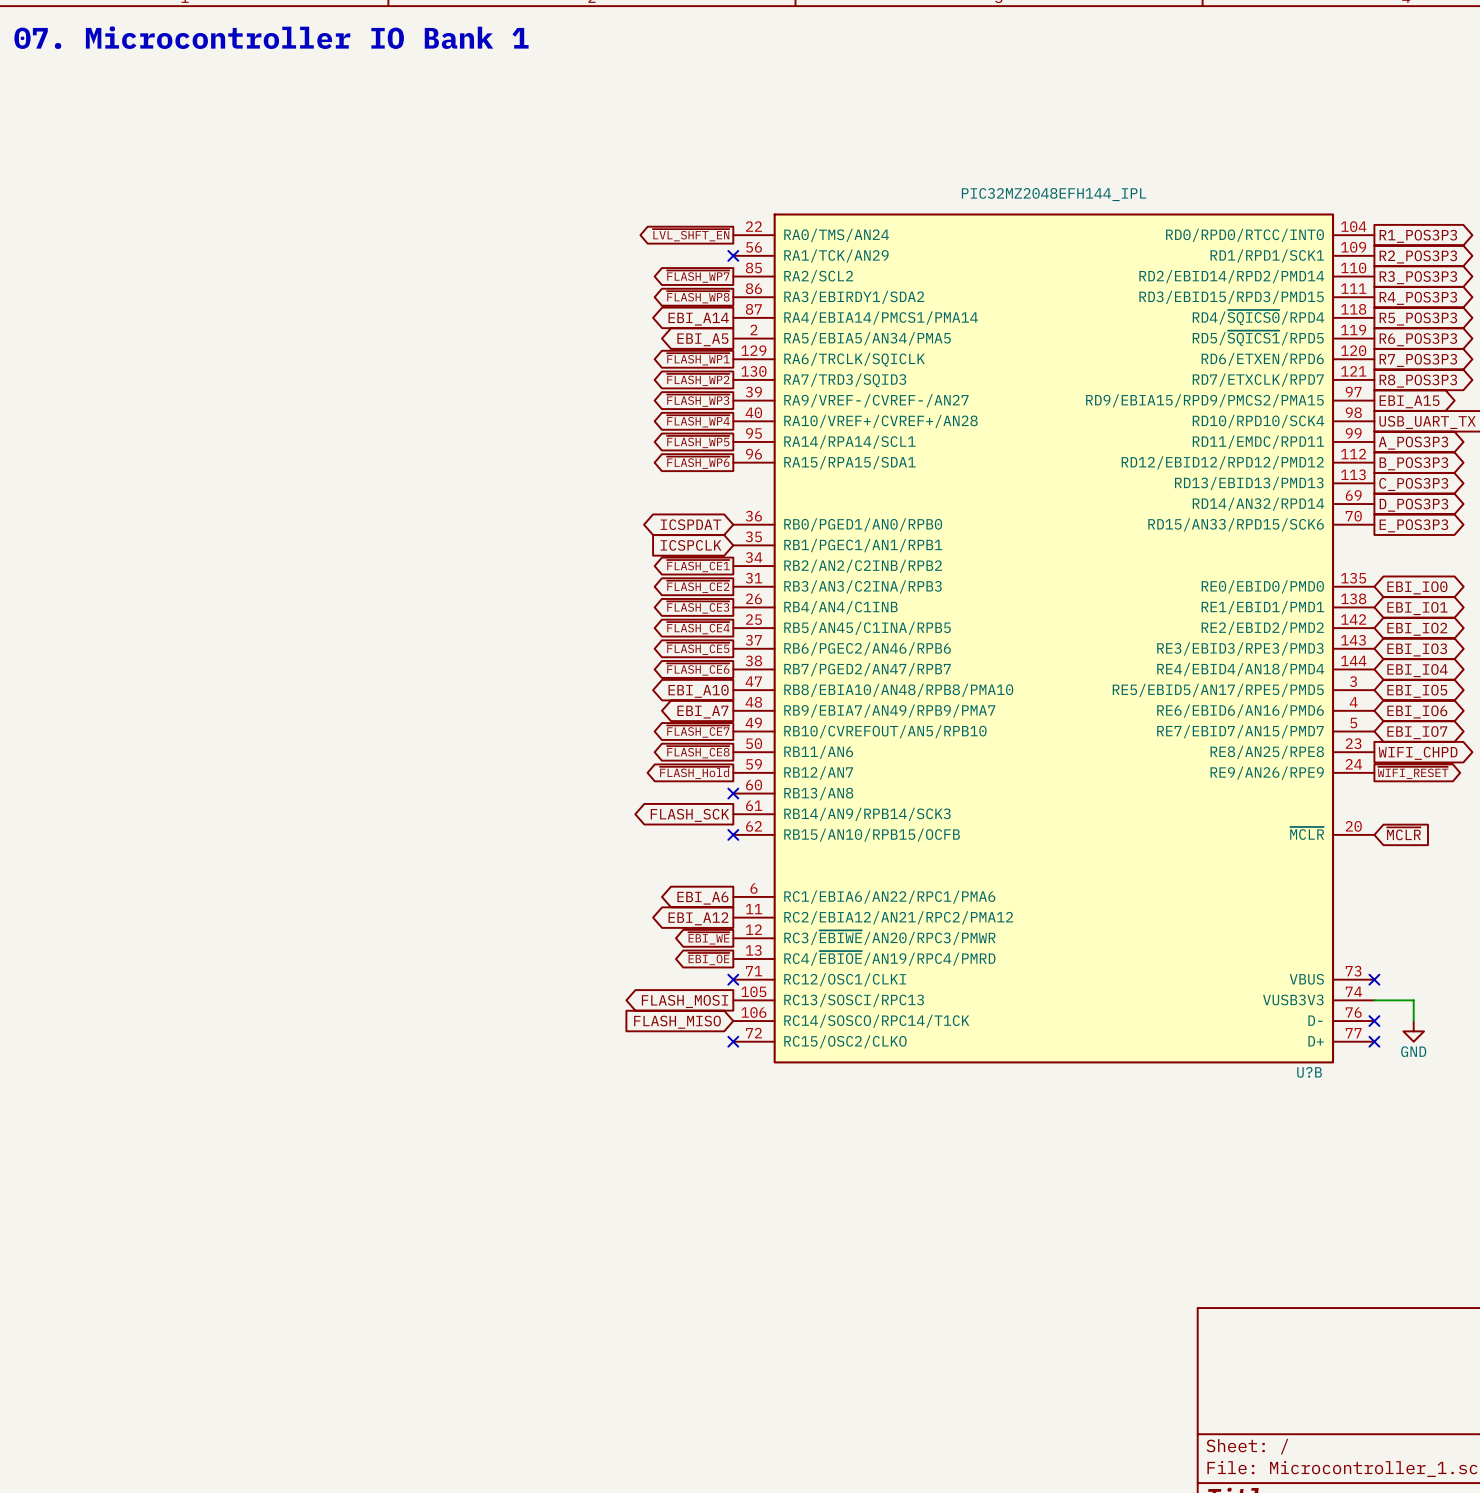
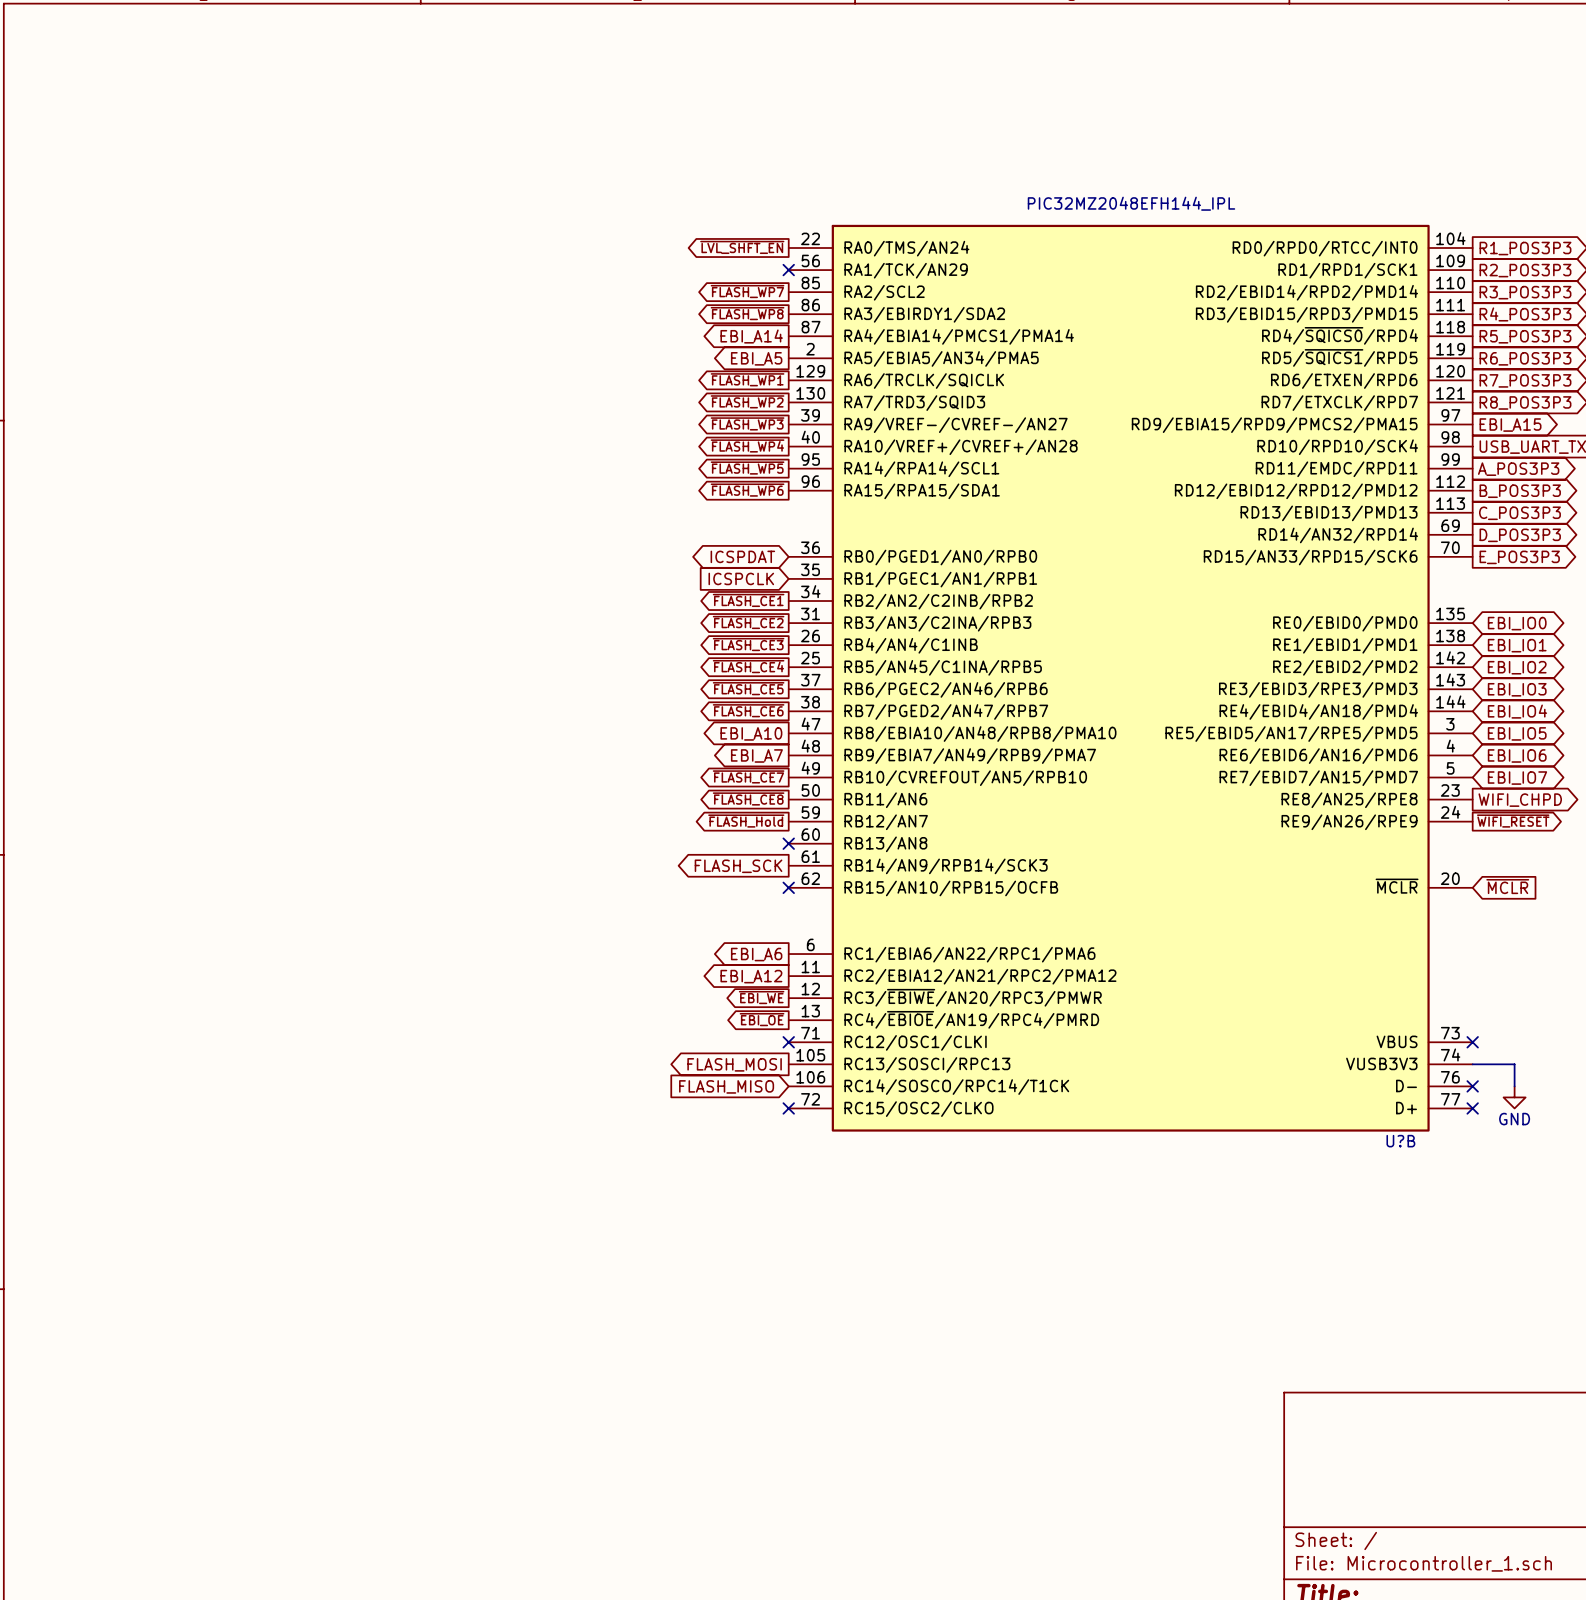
text: 07. Microcontroller IO Bank 1 (271, 37) -> none

